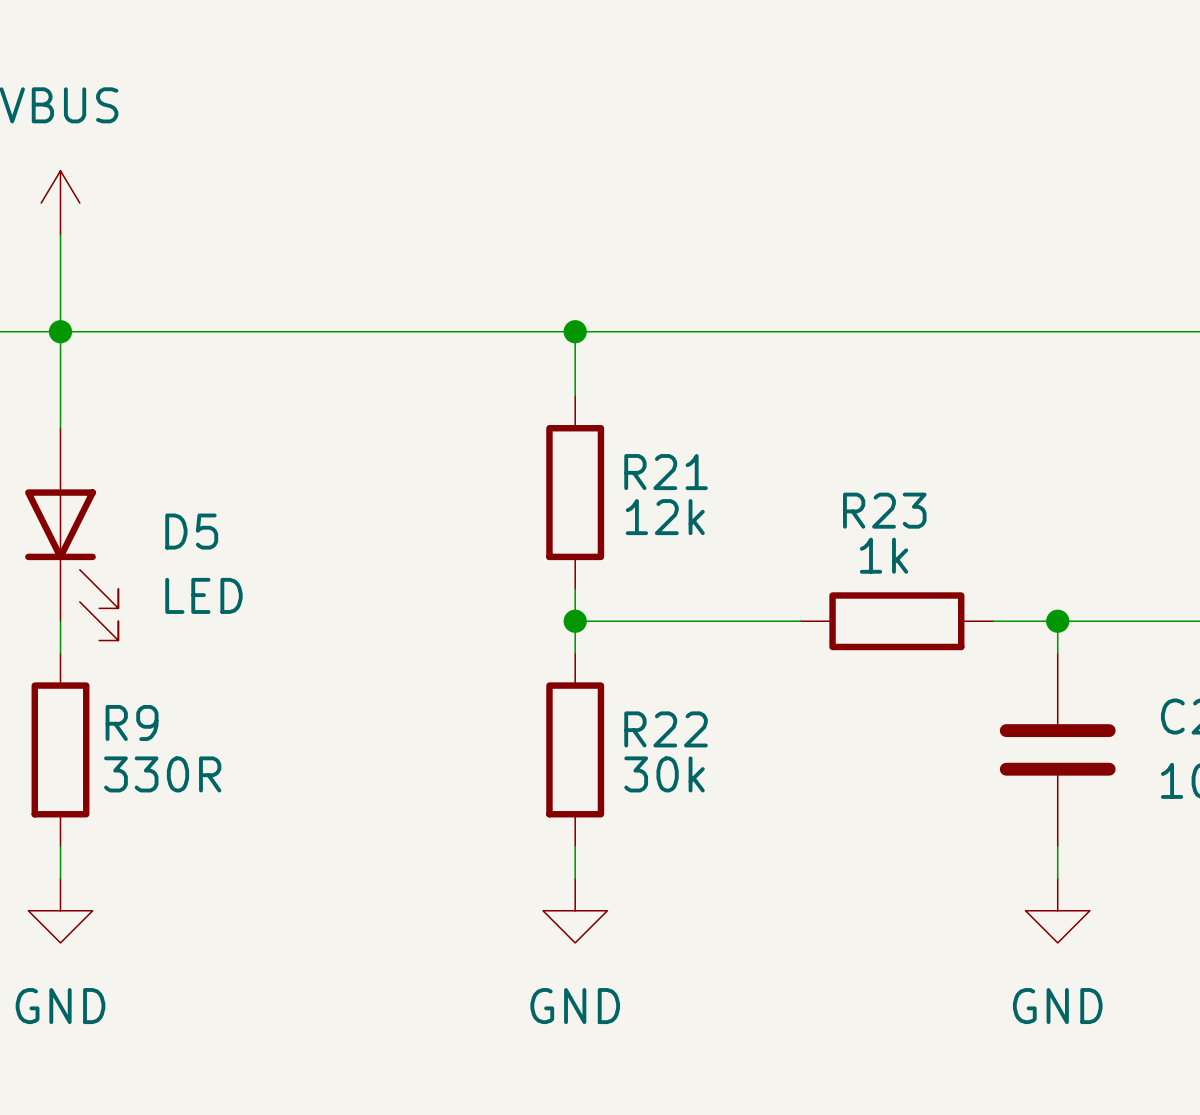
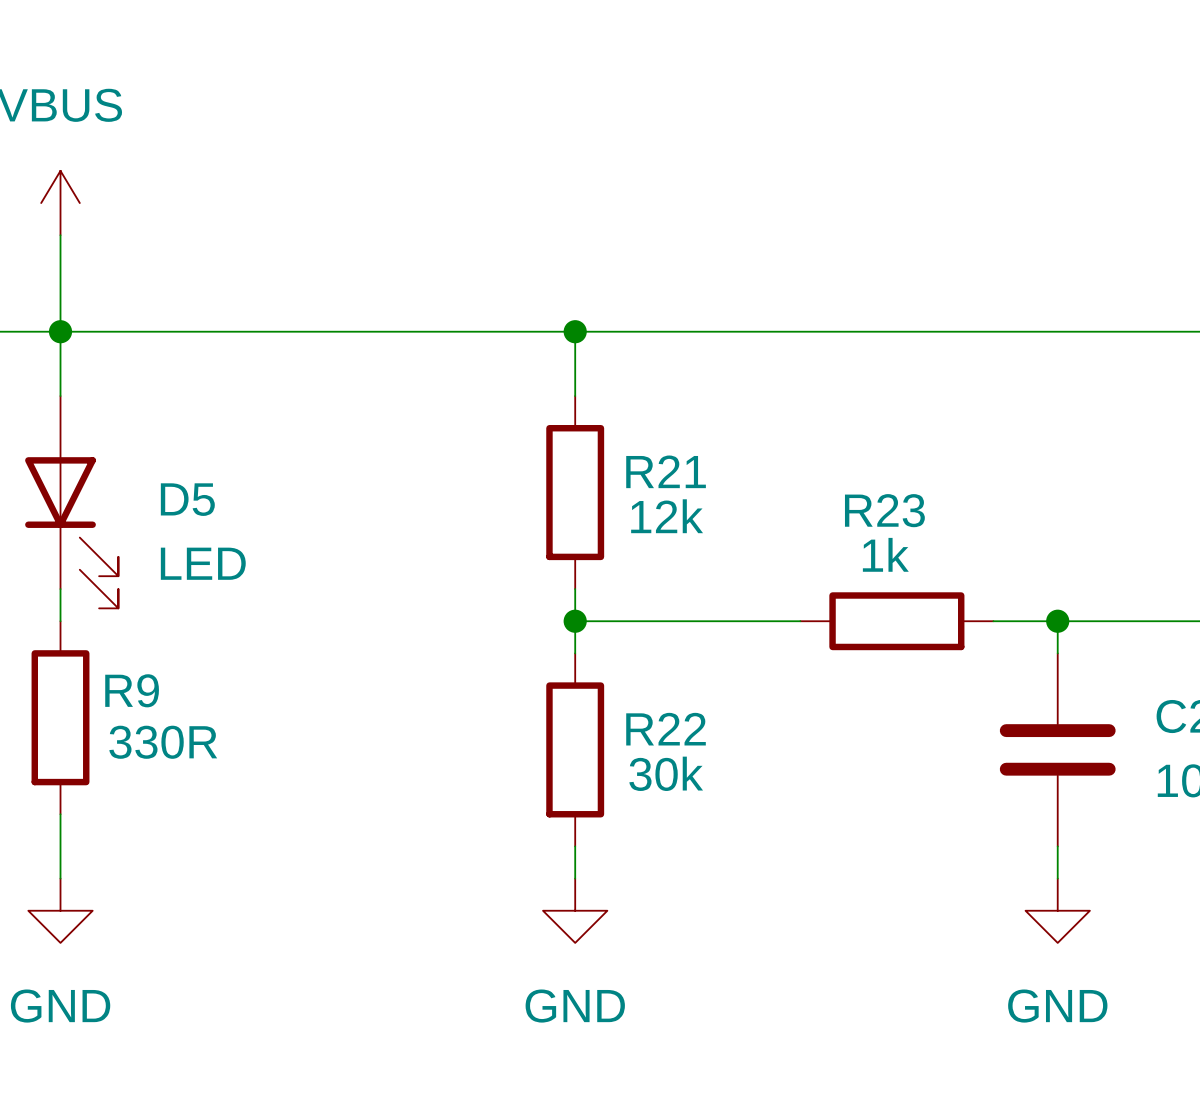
D5 position: (71, 534) -> (71, 502)
R9 position: (60, 749) -> (60, 717)

